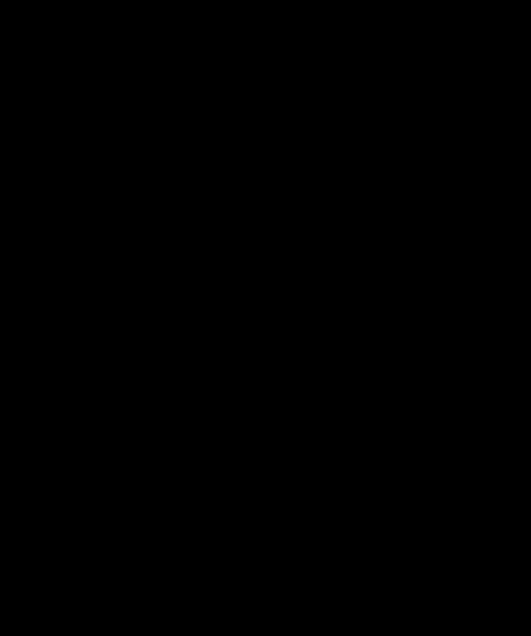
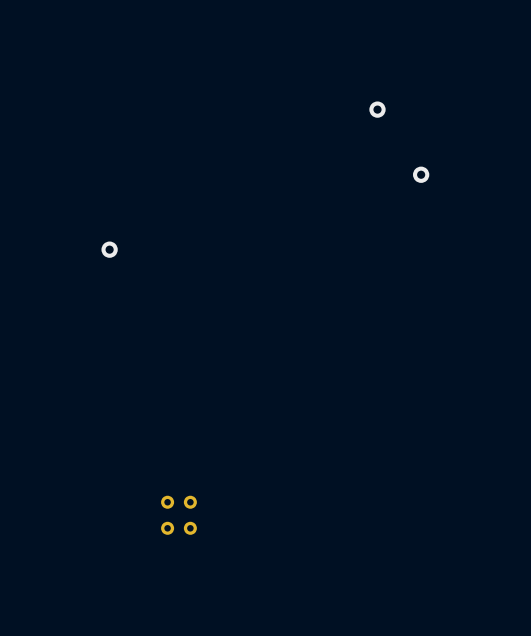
via: none -> (377, 109)
via: none -> (421, 174)
via: none -> (109, 249)
part: none -> (178, 515)

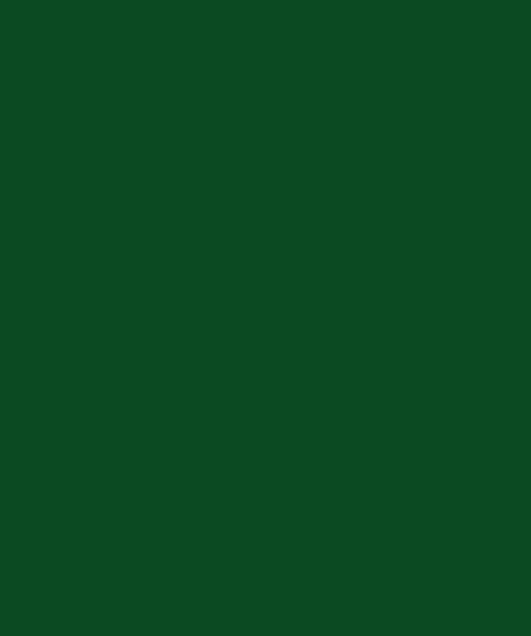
via: (377, 109) -> none
via: (421, 174) -> none
via: (109, 249) -> none
part: (178, 515) -> none

